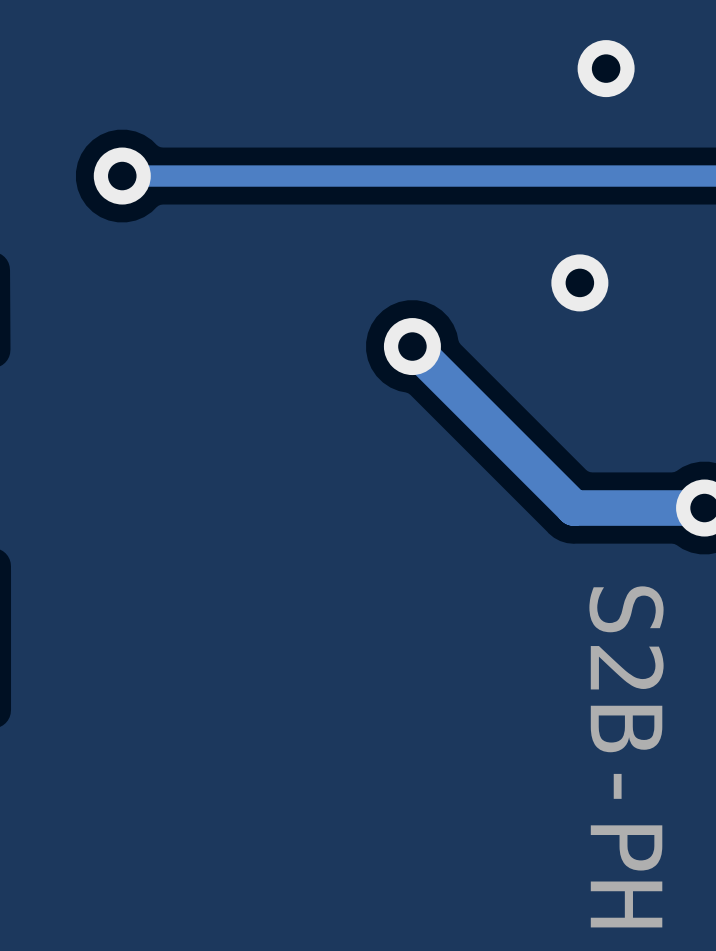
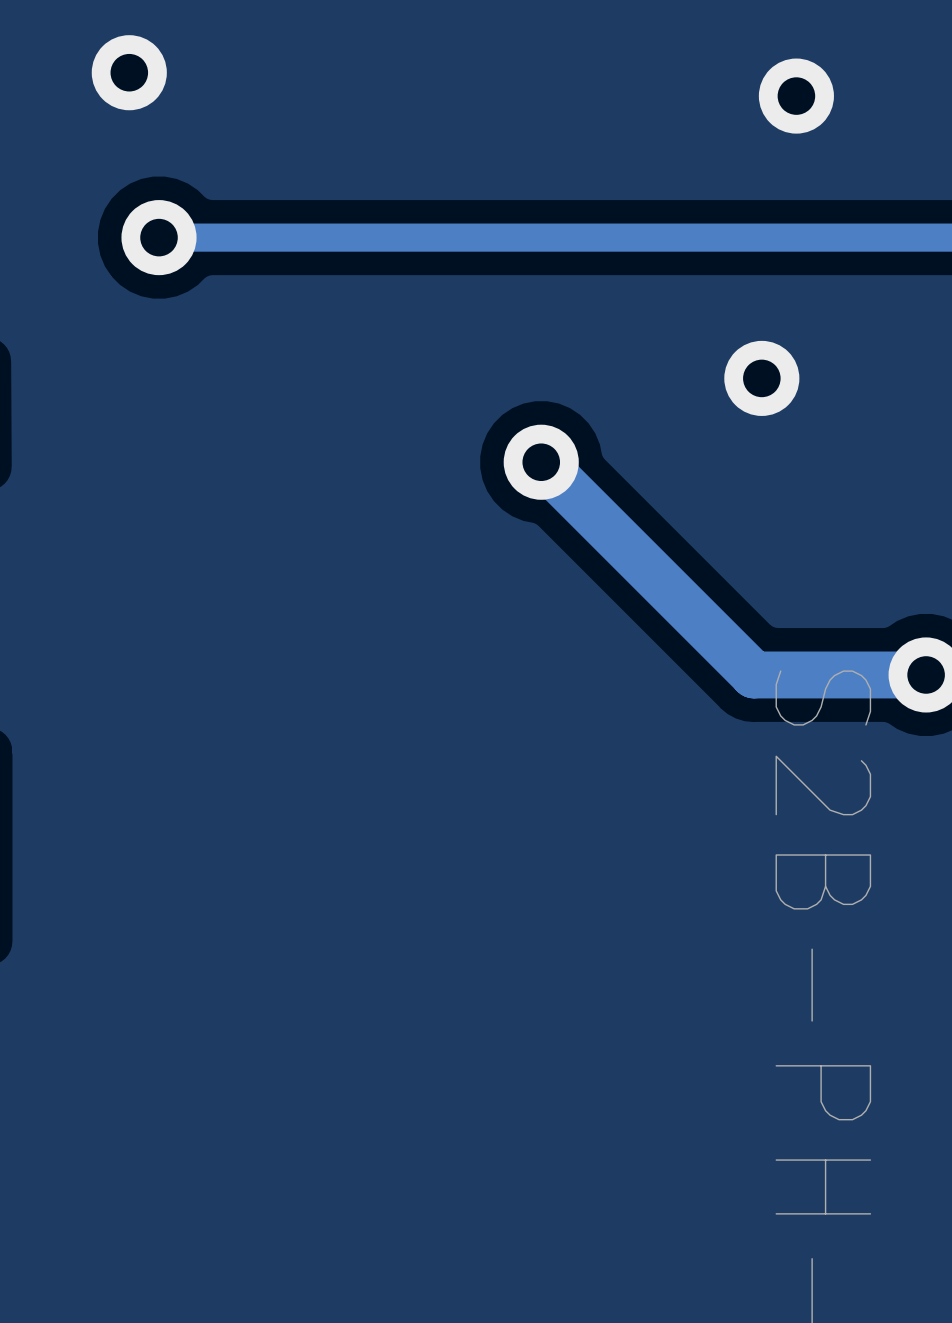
via: none -> (129, 72)

